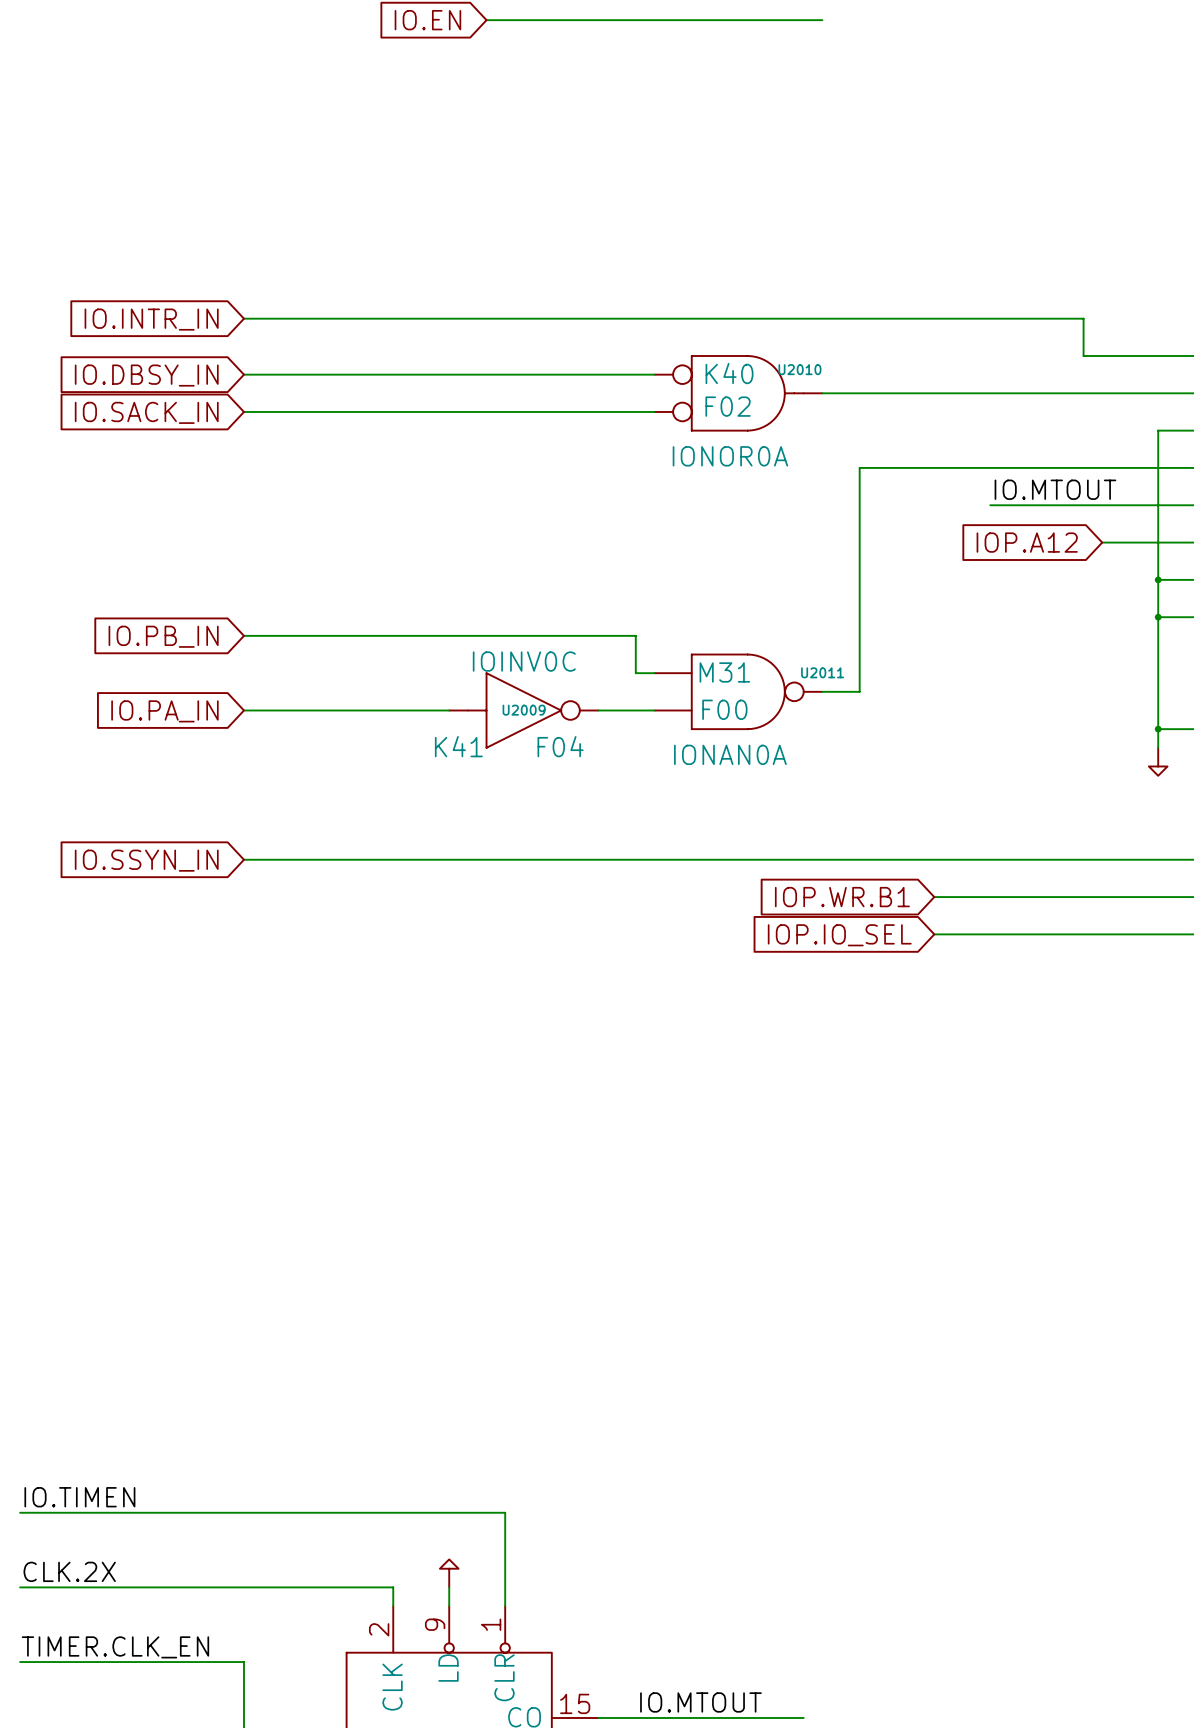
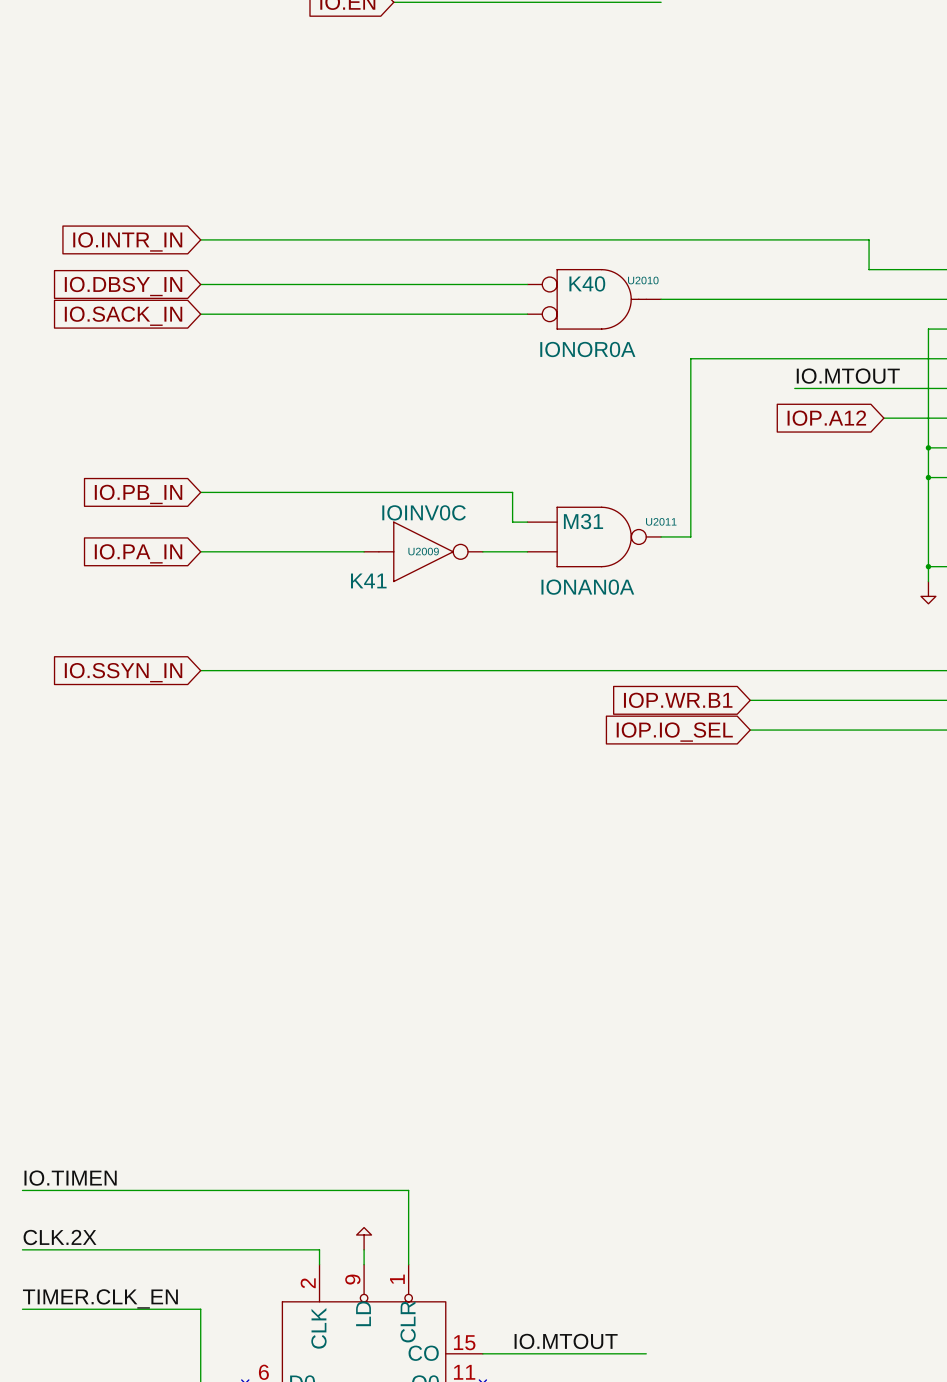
U2010 value: F02 (728, 406) -> none
U2011 value: F00 (724, 709) -> none
U2009 value: F04 (560, 746) -> none

